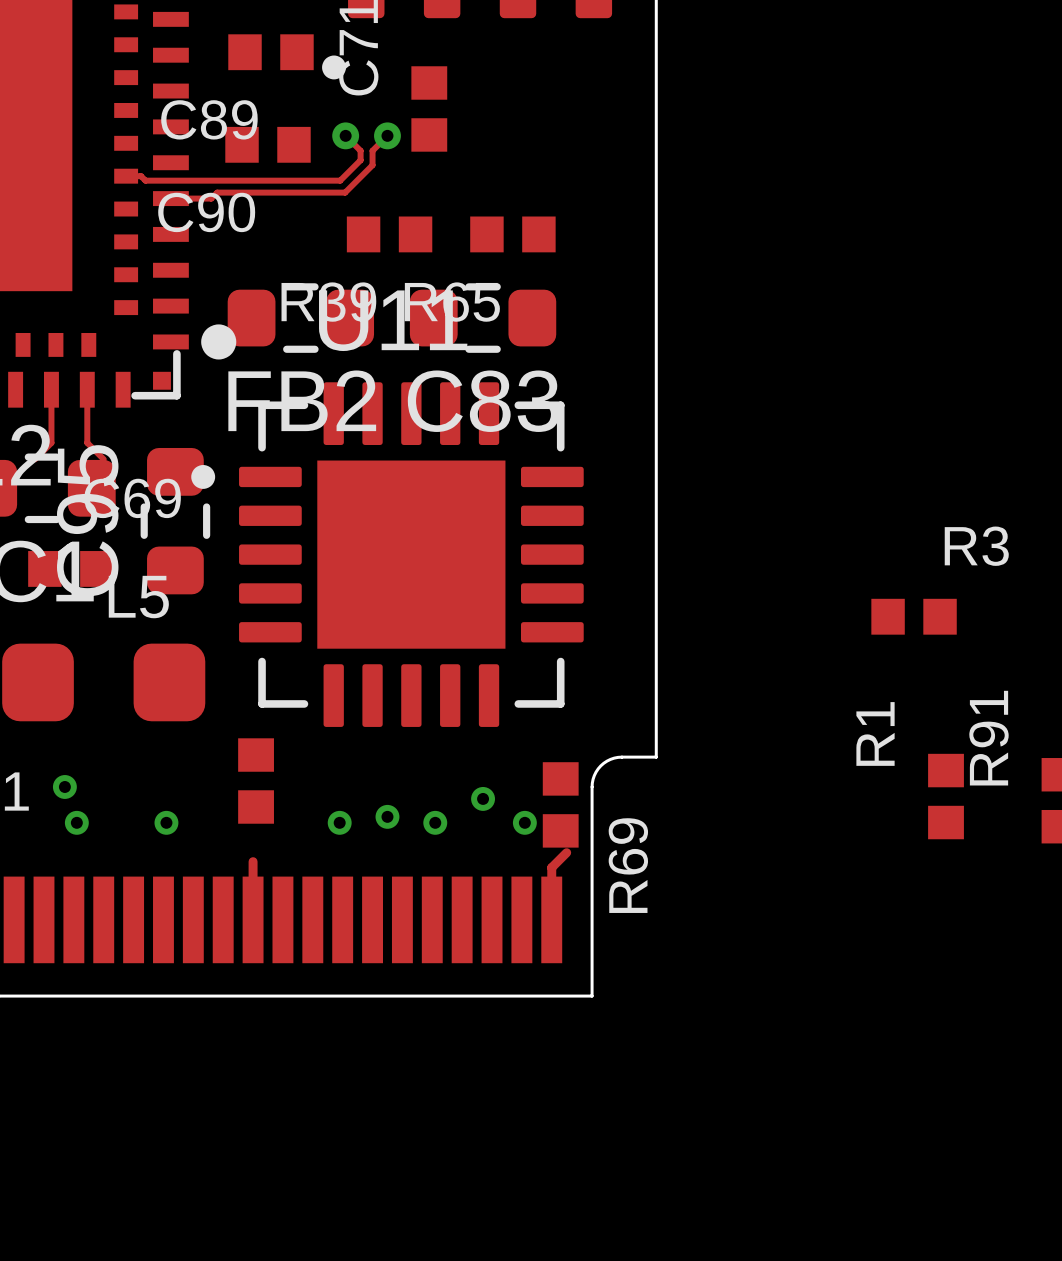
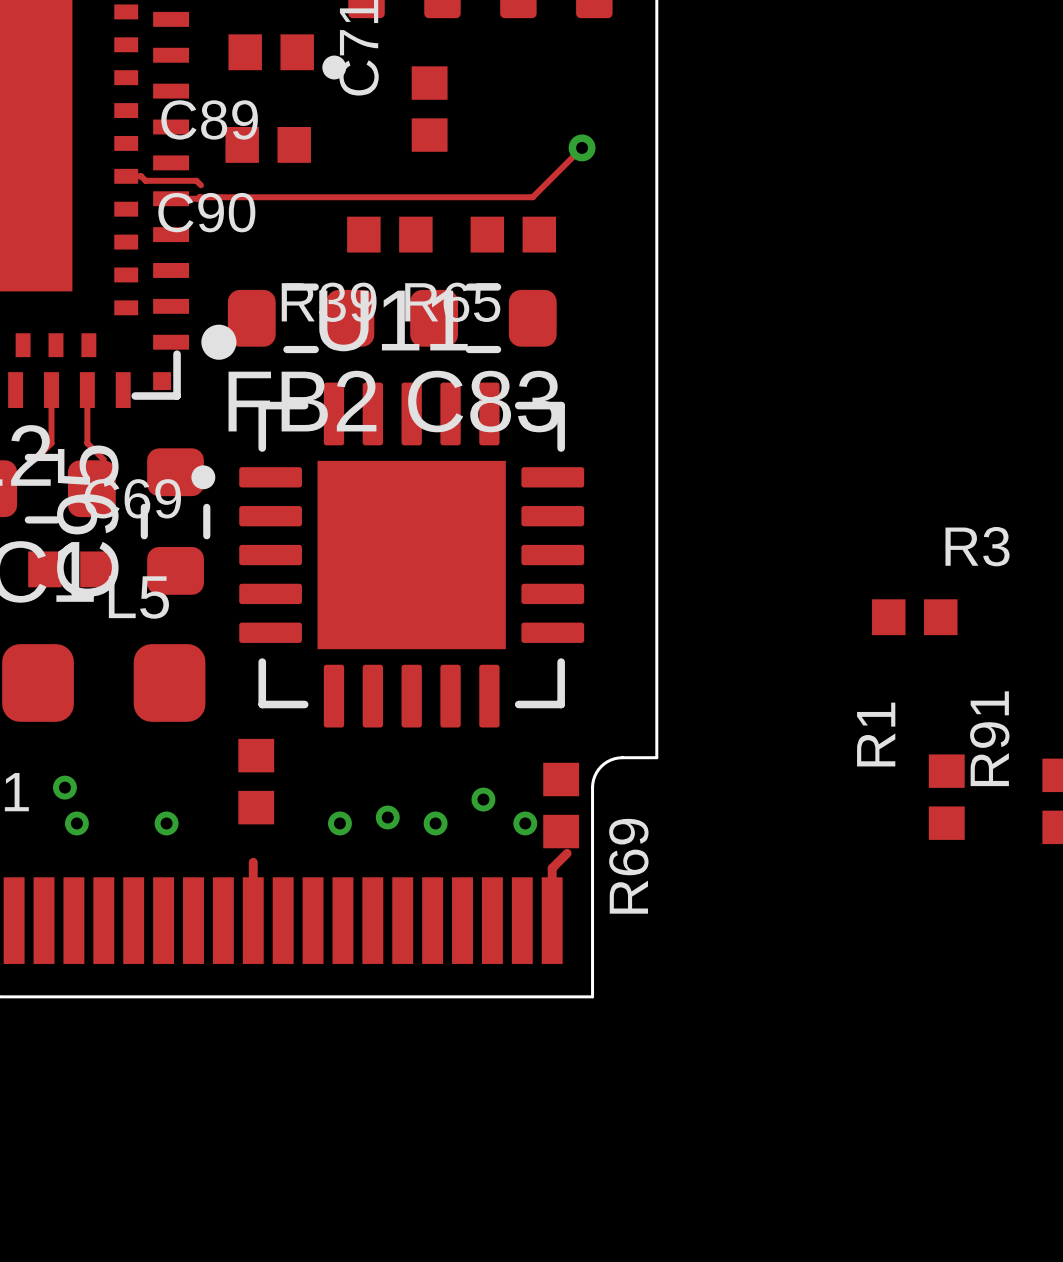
track: (345, 135) (360, 150) (360, 160) (340, 180) (196, 180) -> (200, 185) (196, 180)
via: (345, 135) -> none
track: (387, 135) (372, 150) (372, 165) (345, 192) (217, 192) (211, 198) (197, 198) -> (582, 147) (532, 197) (197, 198)
via: (387, 135) -> none
via: none -> (582, 147)

